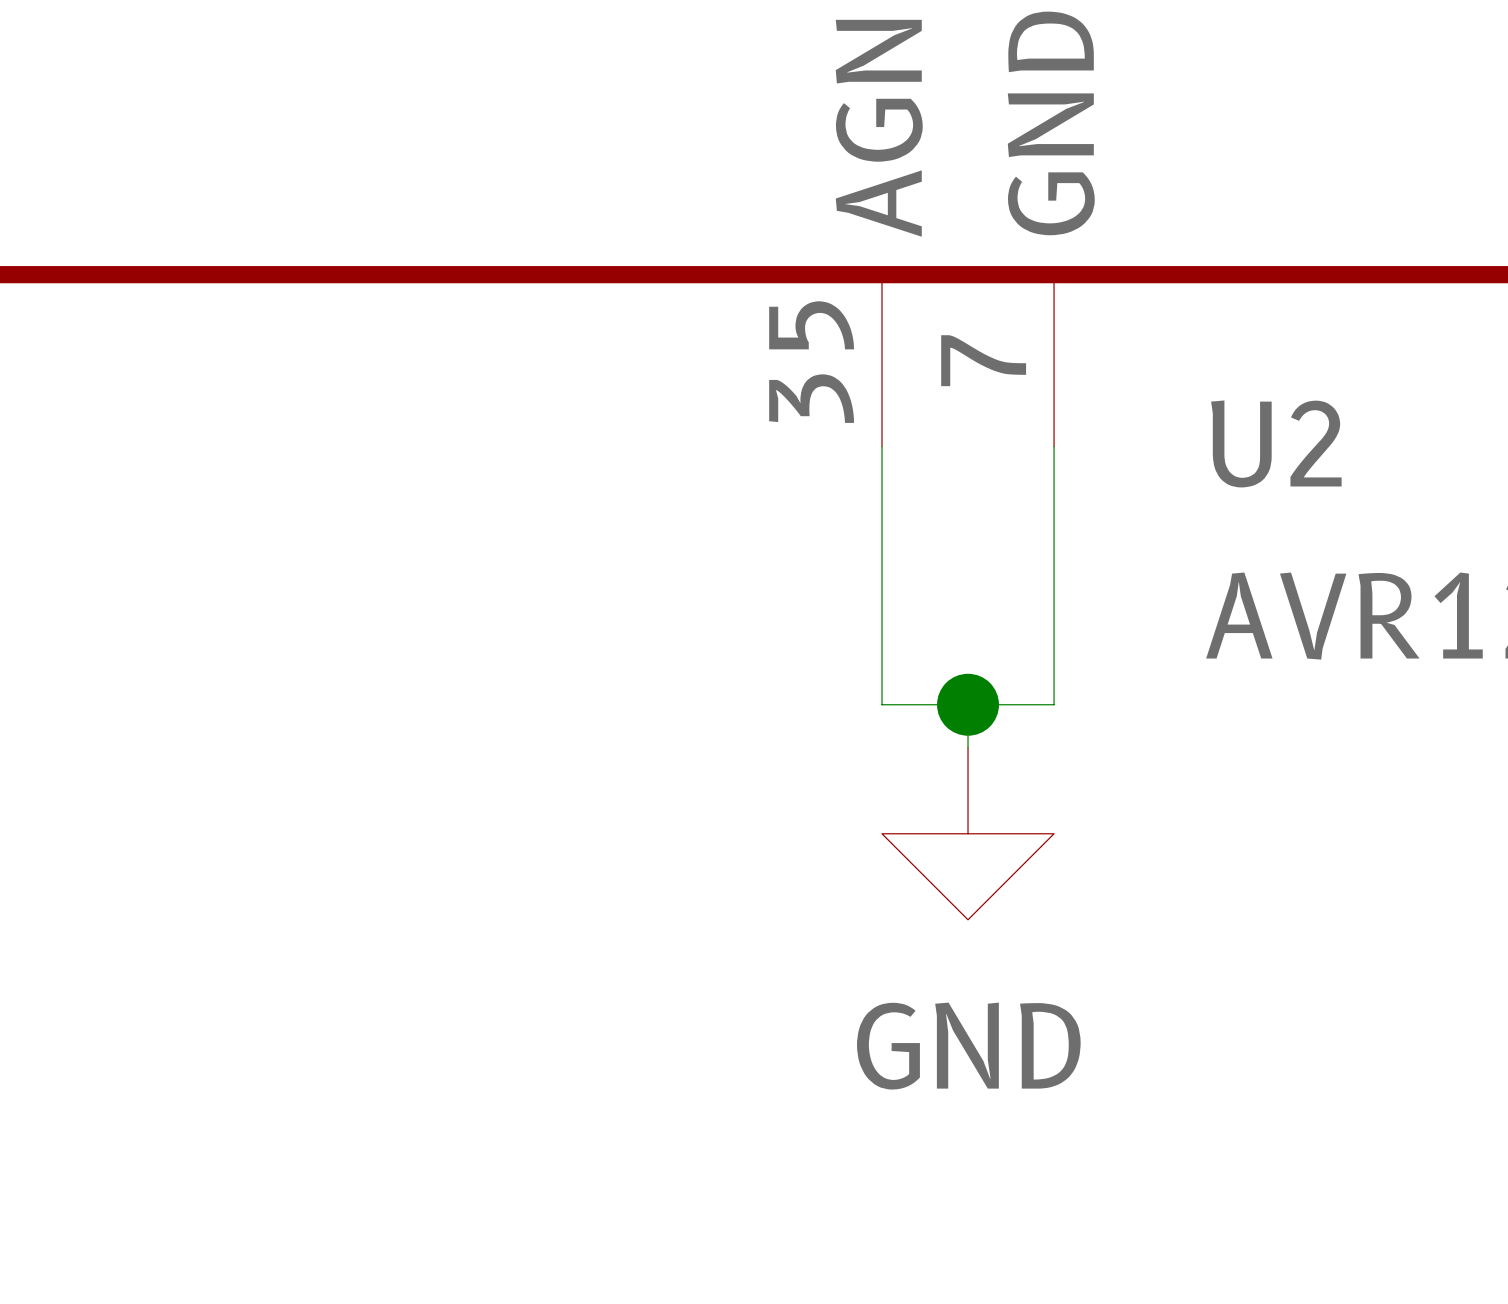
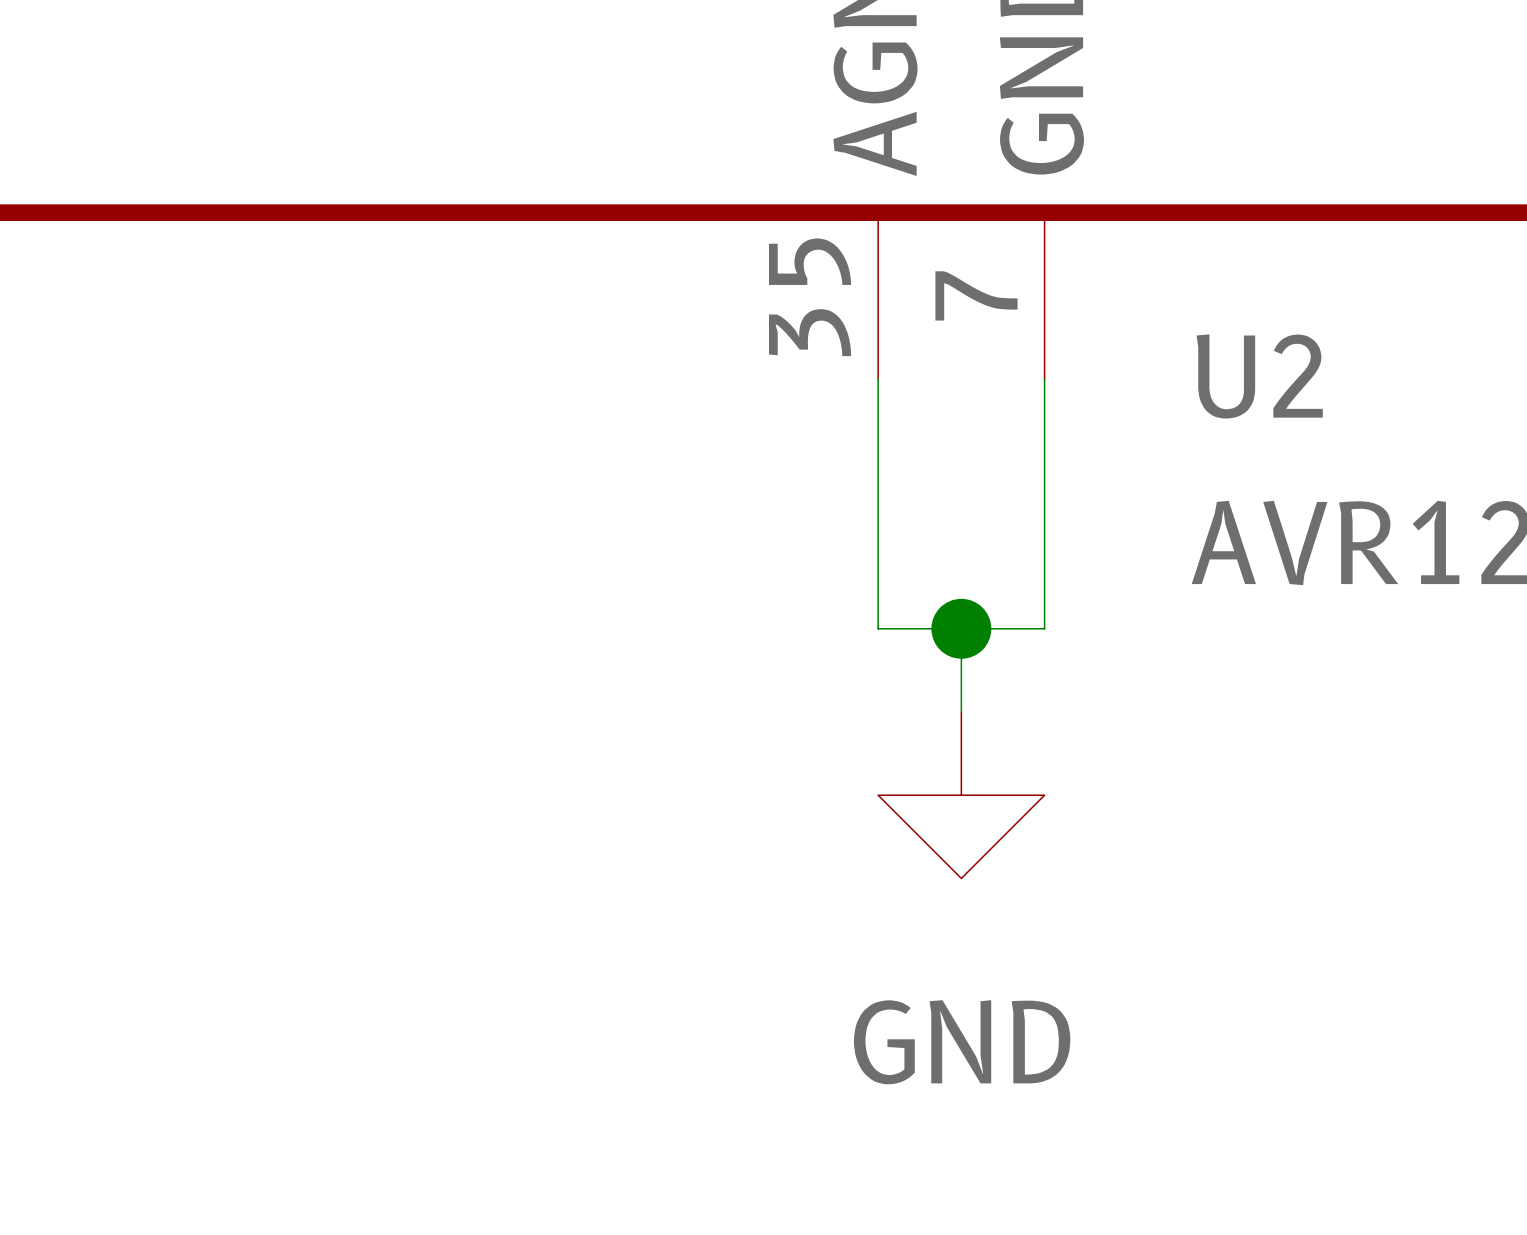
power symbol position: GND (968, 833) -> GND (961, 795)
power symbol text position: GND (968, 1046) -> GND (962, 1042)

